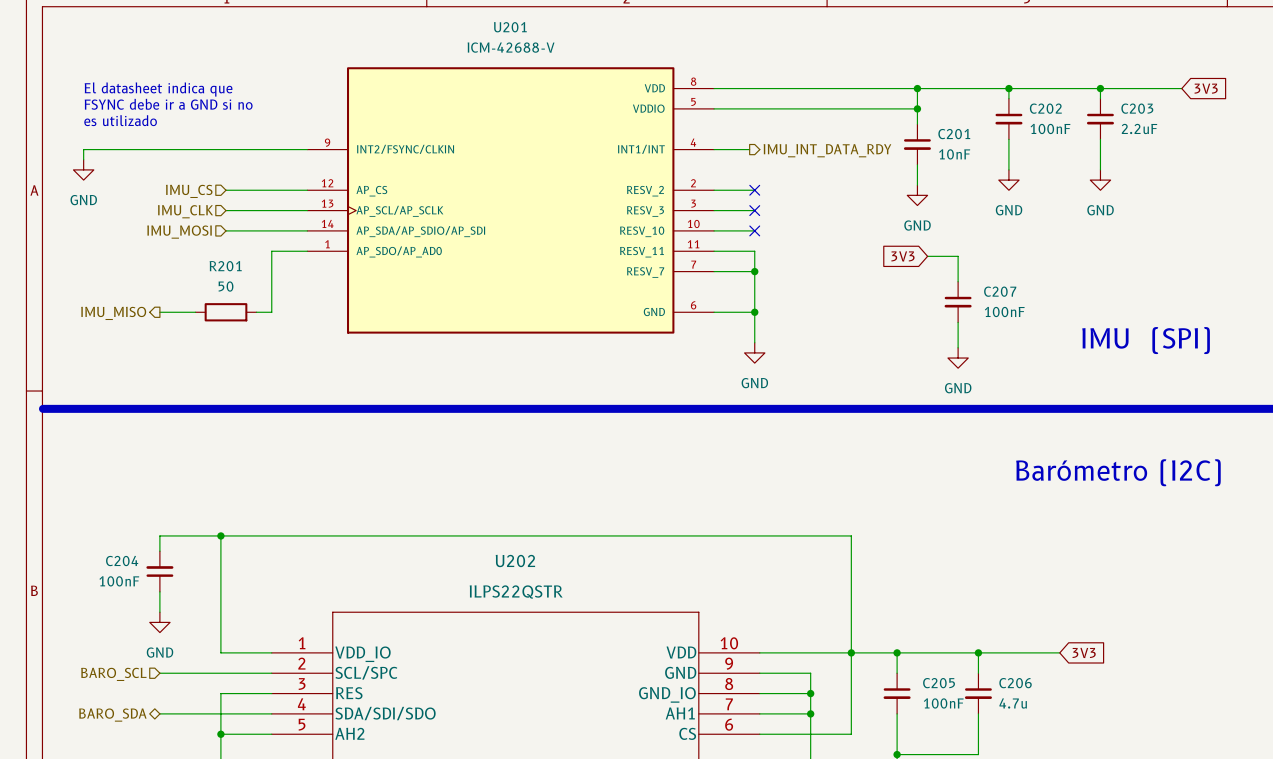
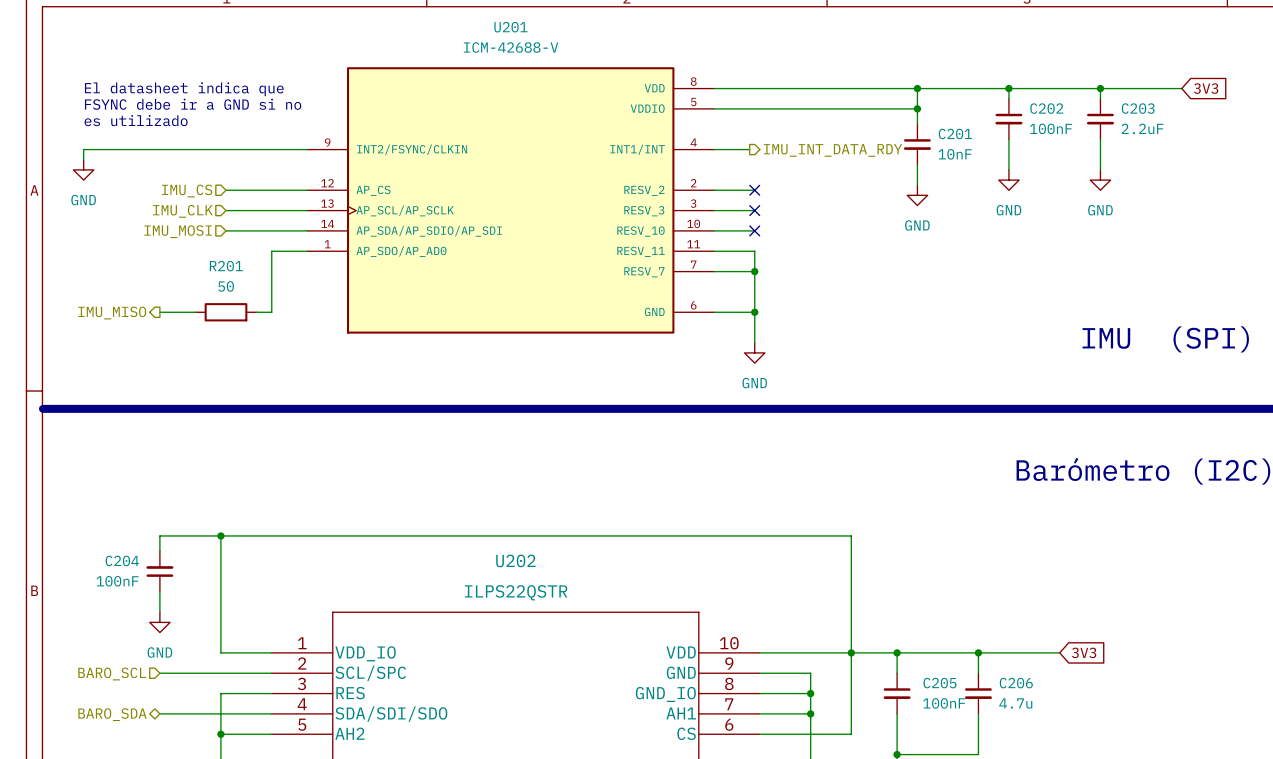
global label: 3V3 (902, 256) -> none
wire: (927, 256) (958, 256) (958, 281) -> none
C207: 100nF (958, 302) -> none
wire: (958, 322) (958, 347) -> none
power symbol: GND (958, 358) -> none

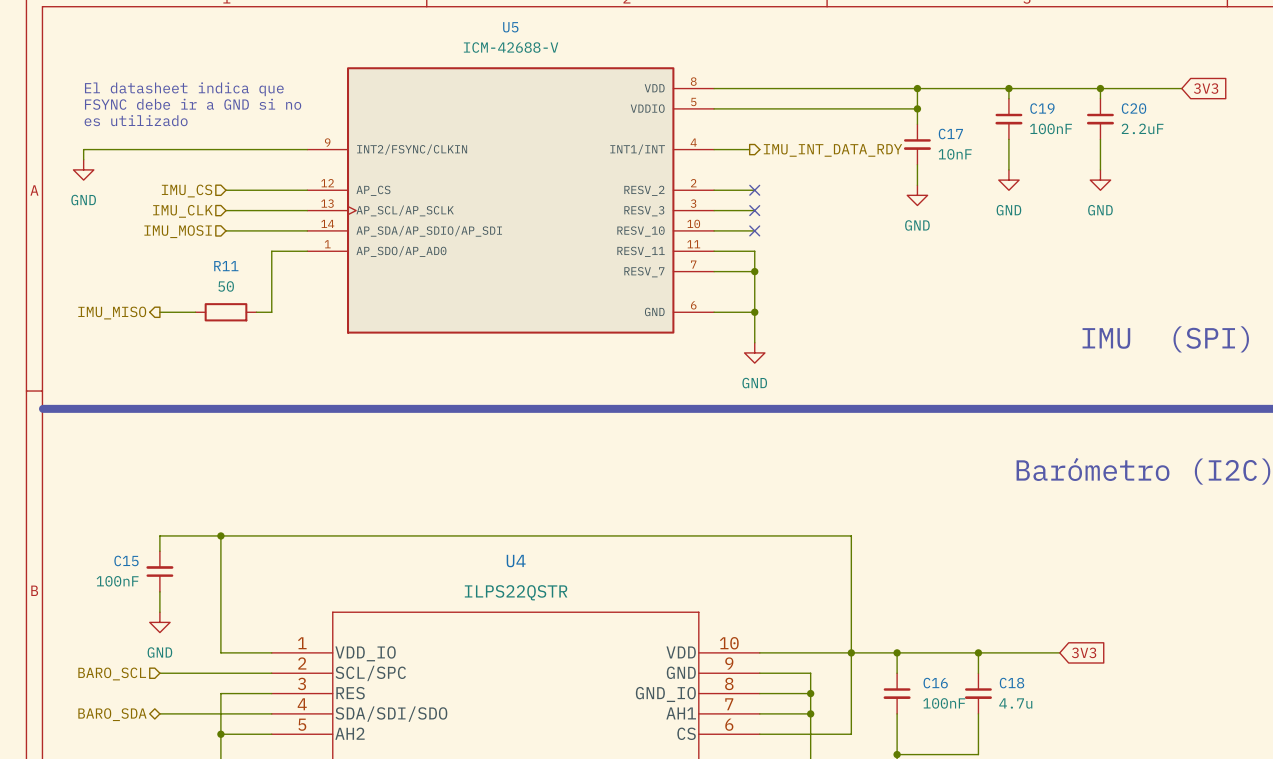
U201 name: U201 (510, 27) -> U5 (510, 27)
C202 name: C202 (1046, 108) -> C19 (1042, 108)
C203 name: C203 (1138, 108) -> C20 (1134, 108)
C201 name: C201 (955, 134) -> C17 (950, 134)
R201 name: R201 (226, 266) -> R11 (226, 266)
C204 name: C204 (122, 560) -> C15 (126, 560)
U202 name: U202 (515, 560) -> U4 (516, 561)
C205 name: C205 (940, 683) -> C16 (935, 683)
C206 name: C206 (1016, 683) -> C18 (1011, 683)

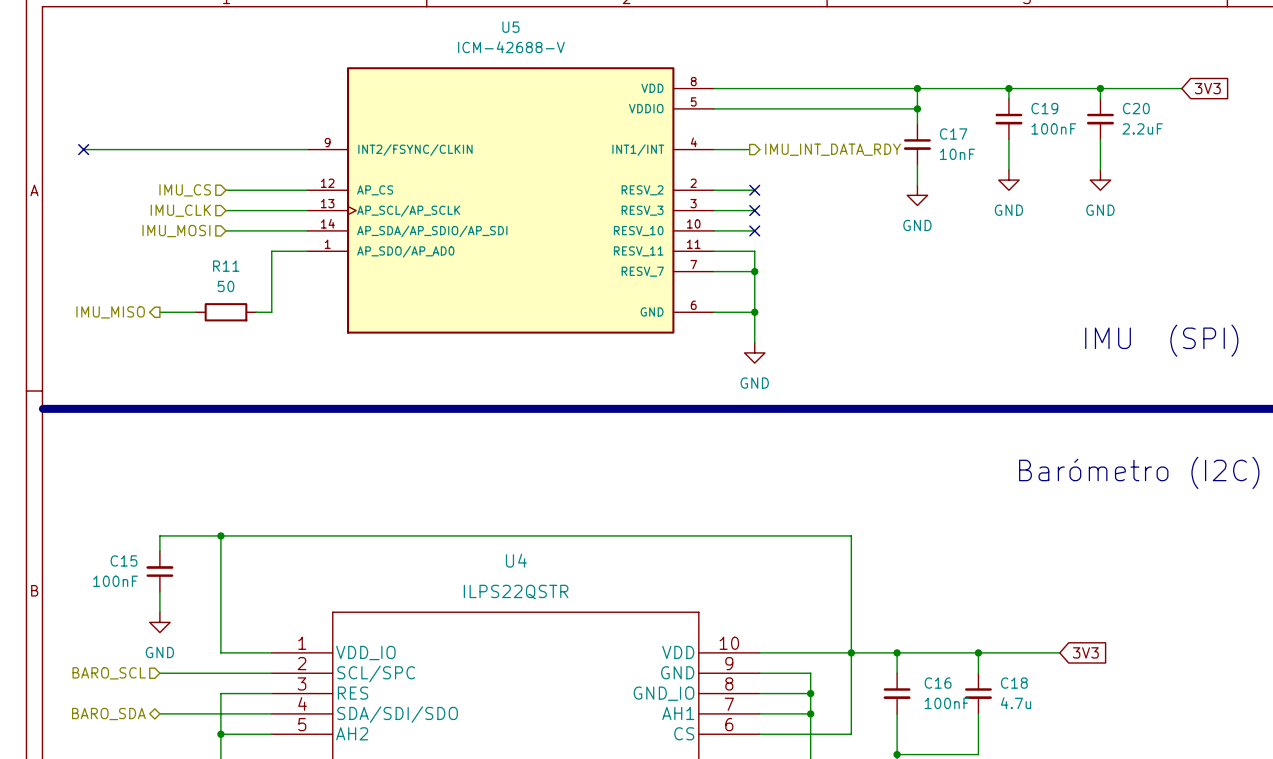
text: El datasheet indica que (184, 89) -> none
text: FSYNC debe ir a GND si no (193, 104) -> none
text: es utilizado (136, 120) -> none
wire: (83, 149) (83, 159) -> none
no-connect mark: none -> (83, 149)
power symbol: GND (83, 169) -> none

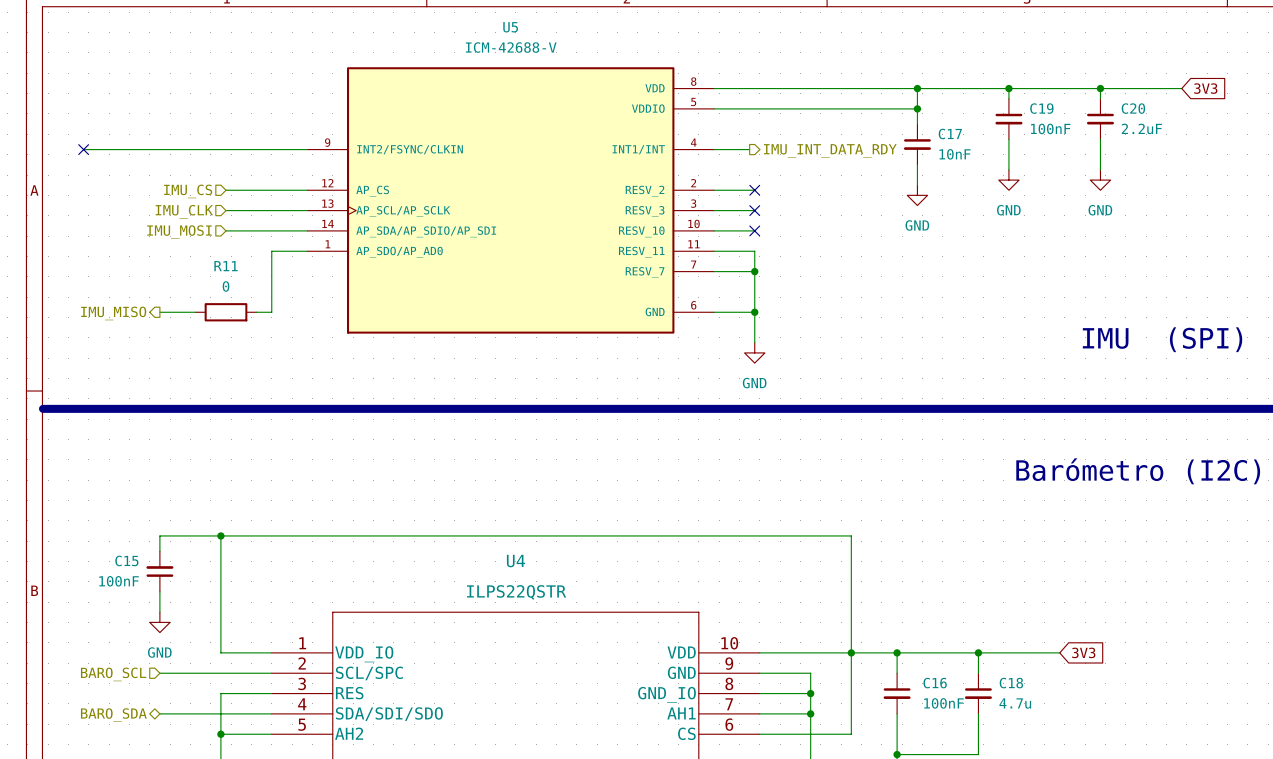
R11 value: 50 (226, 286) -> 0 (226, 286)

